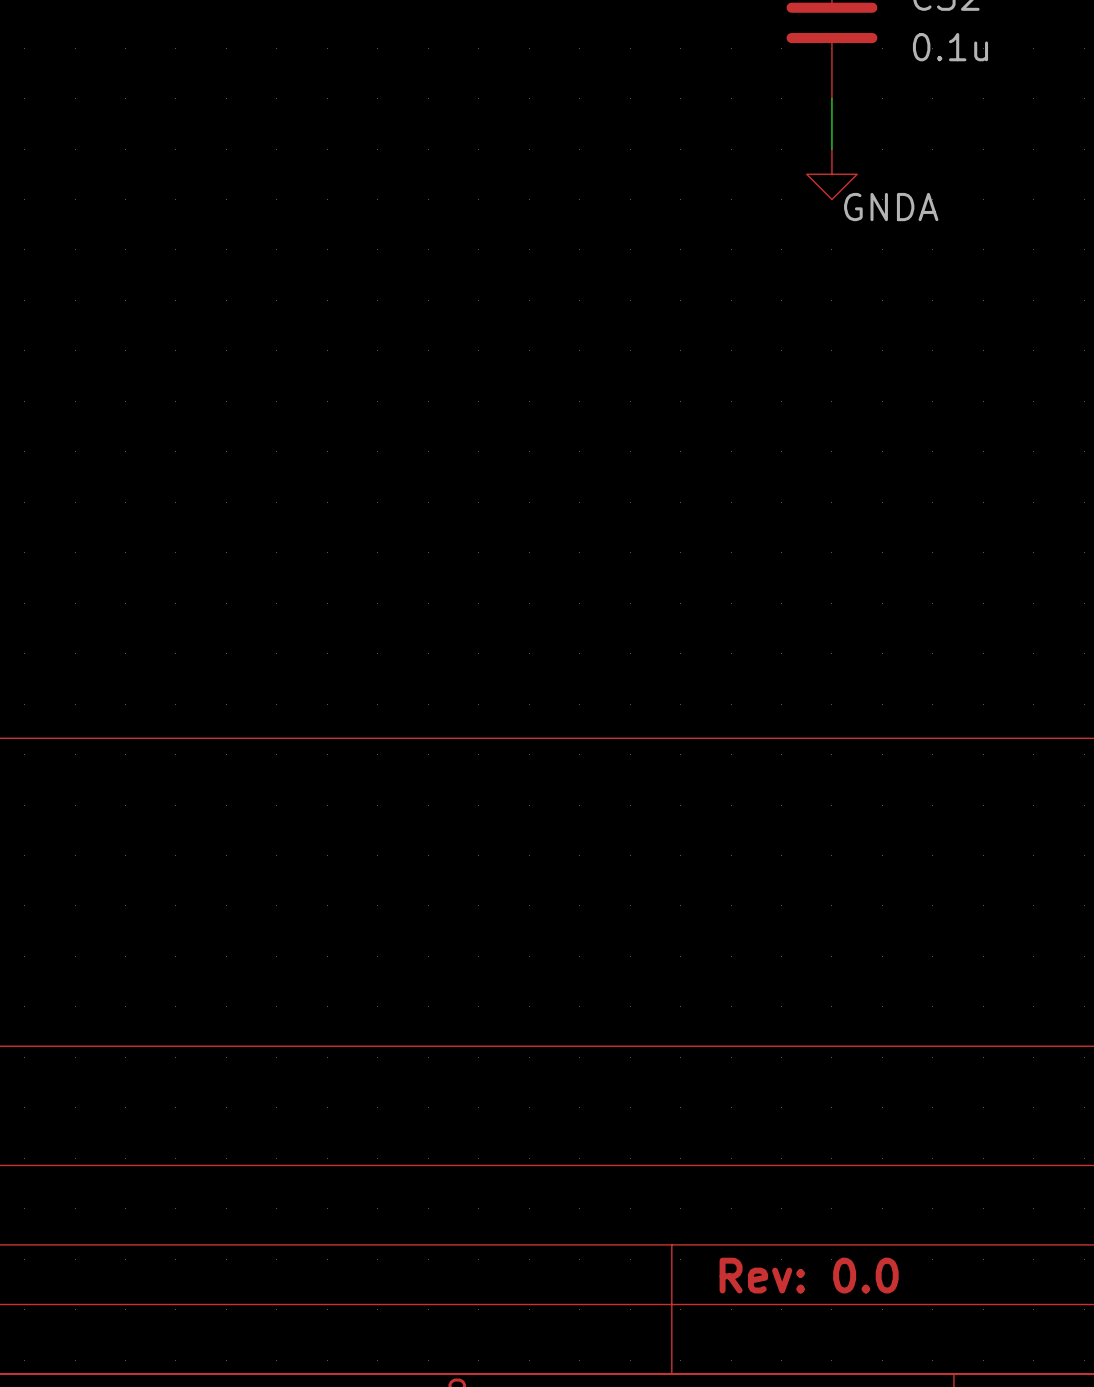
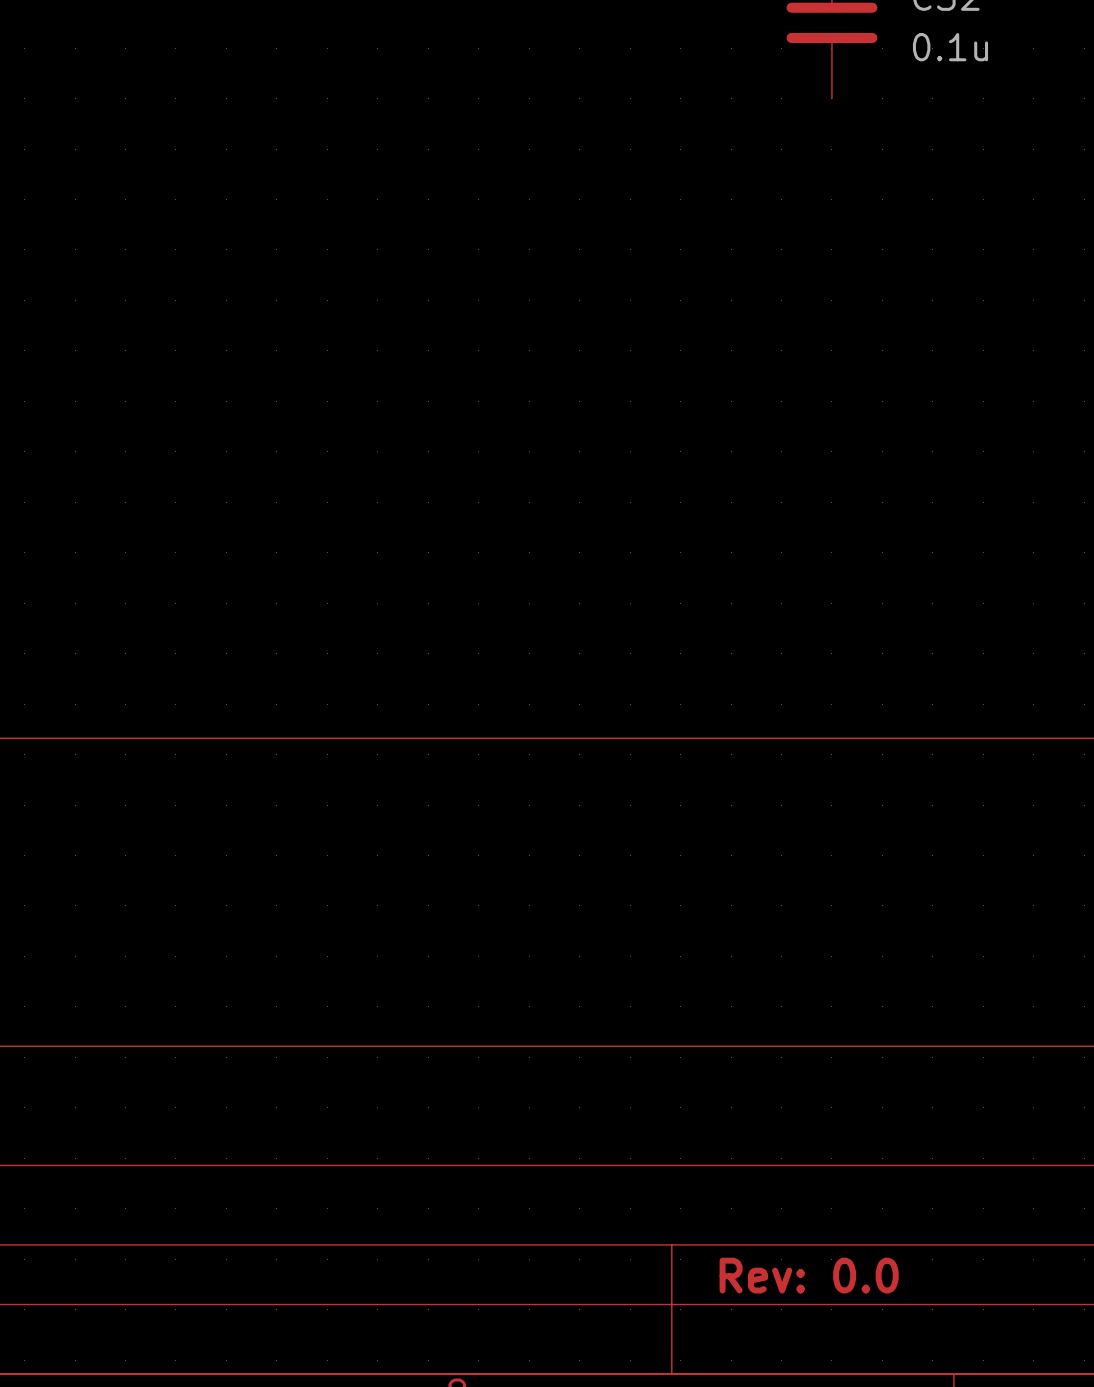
wire: (831, 98) (831, 149) -> none
power symbol: GNDA (831, 174) -> none

